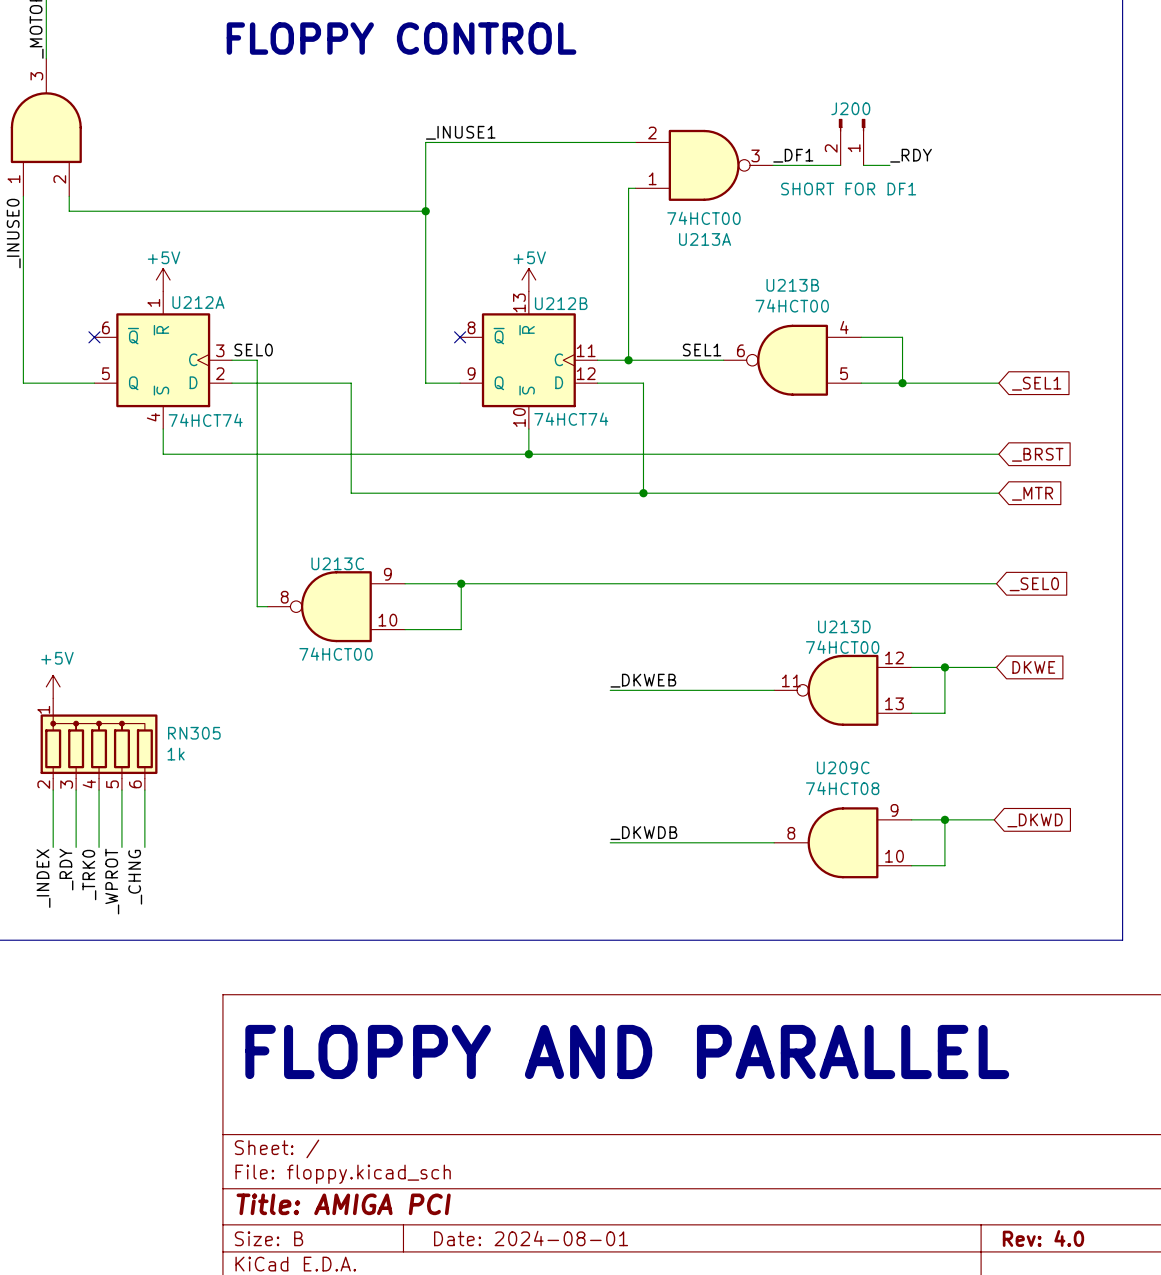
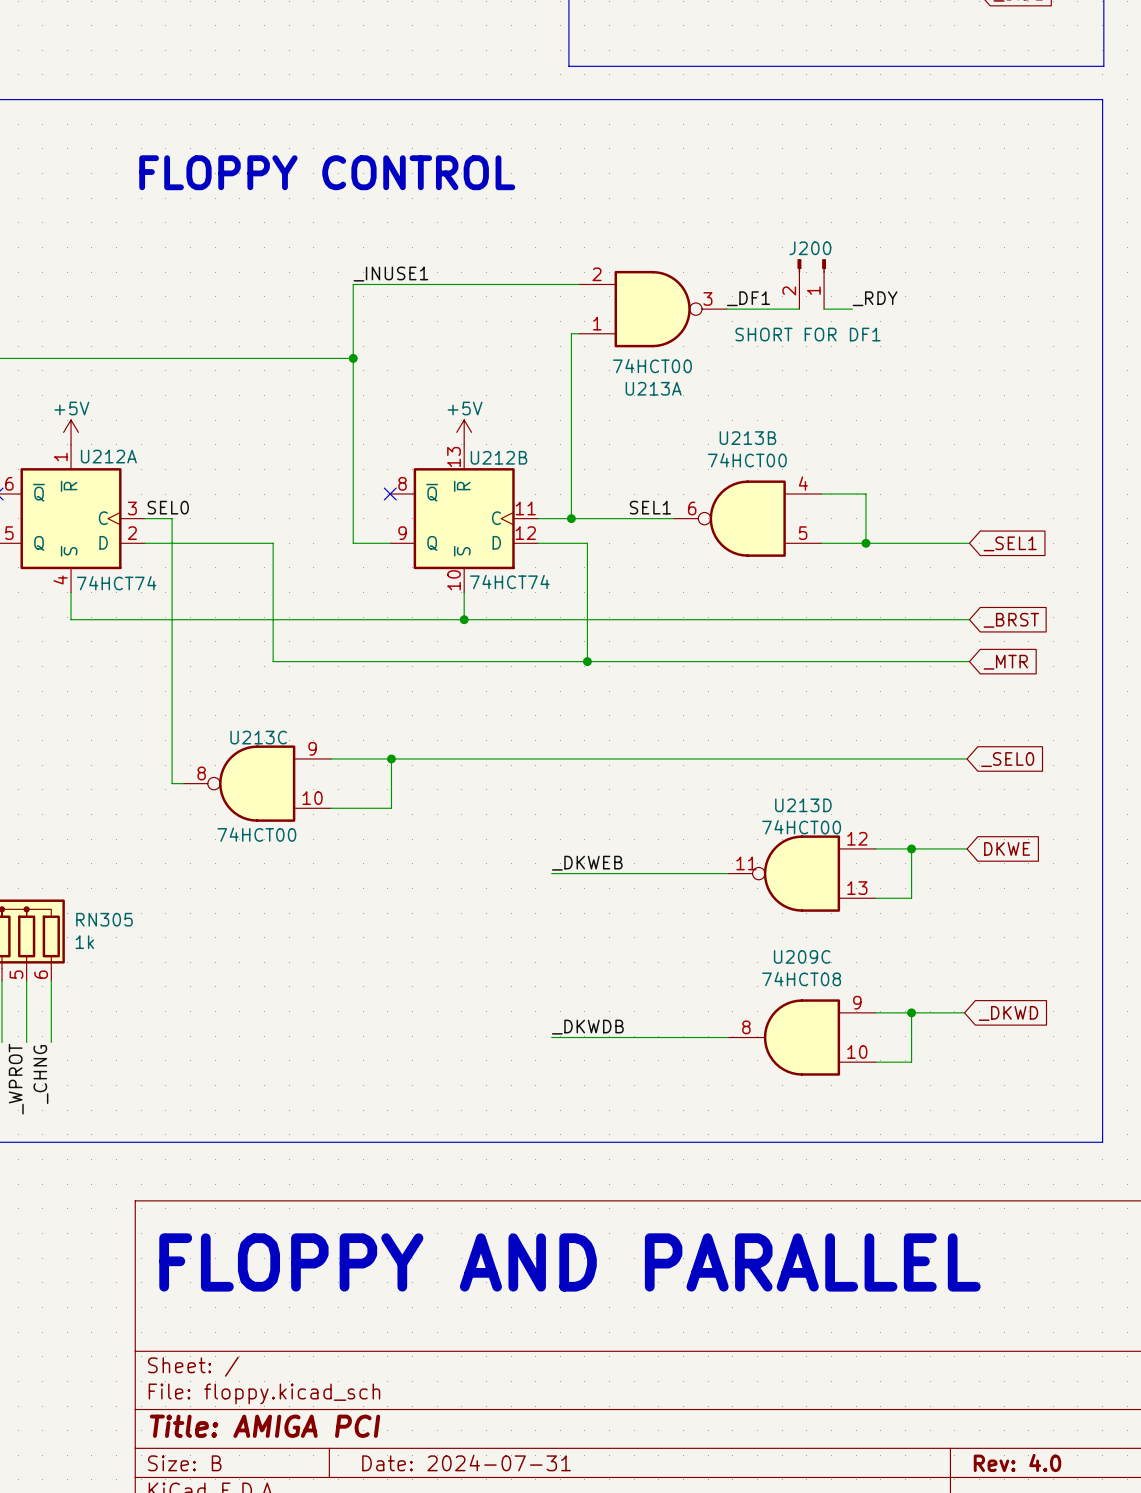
title block: Date: 2024-08-01 (531, 1238) -> Date: 2024-07-31 (466, 1462)

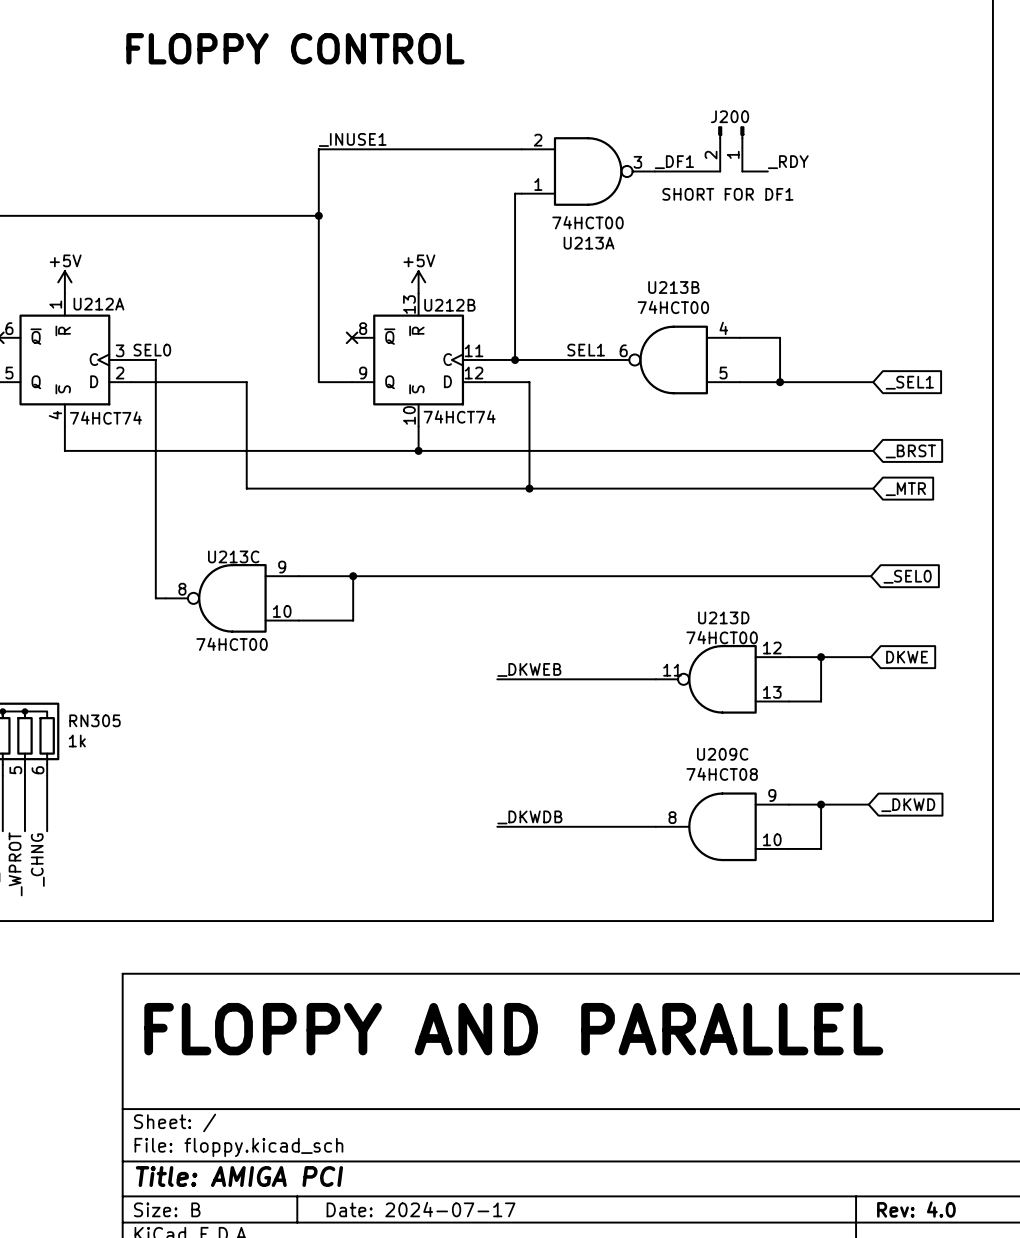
title block: Date: 2024-07-31 (466, 1462) -> Date: 2024-07-17 (421, 1209)

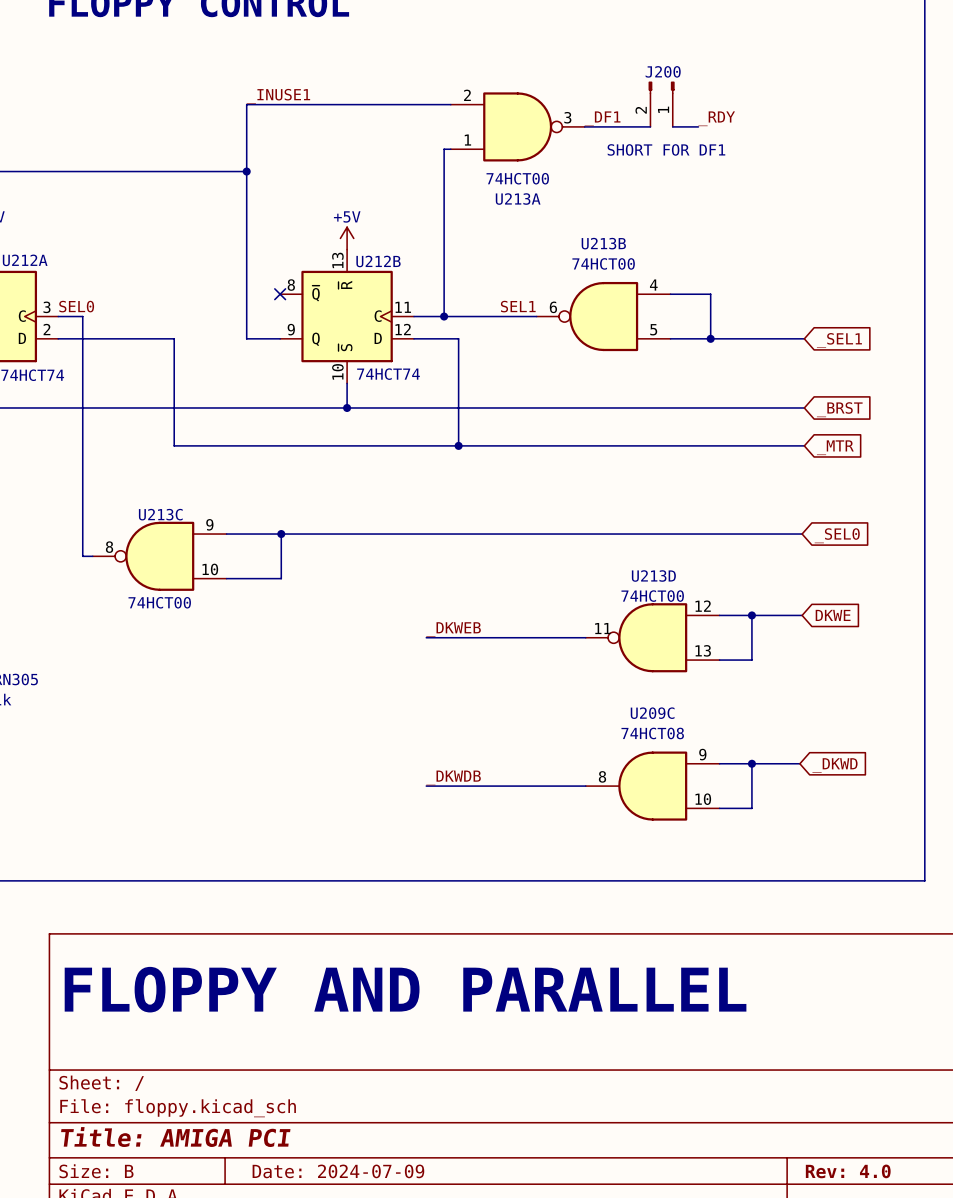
title block: Date: 2024-07-17 (421, 1209) -> Date: 2024-07-09 (338, 1171)

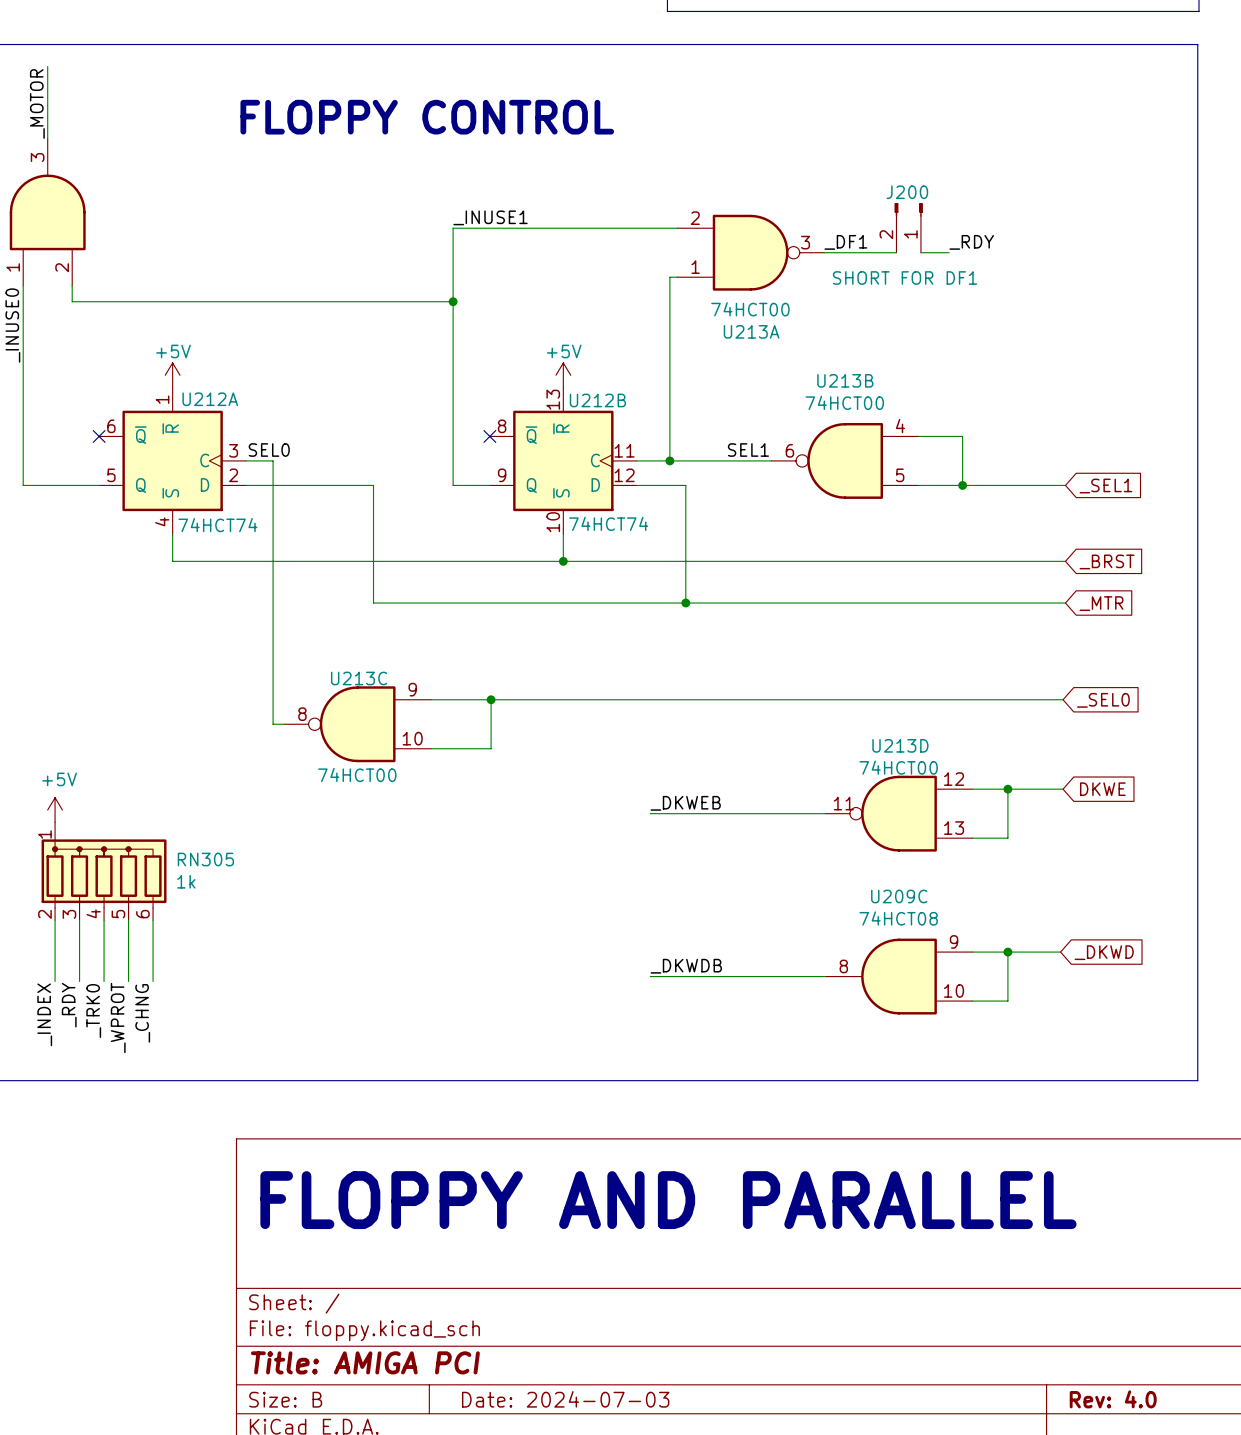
title block: Date: 2024-07-09 (338, 1171) -> Date: 2024-07-03 (565, 1399)

